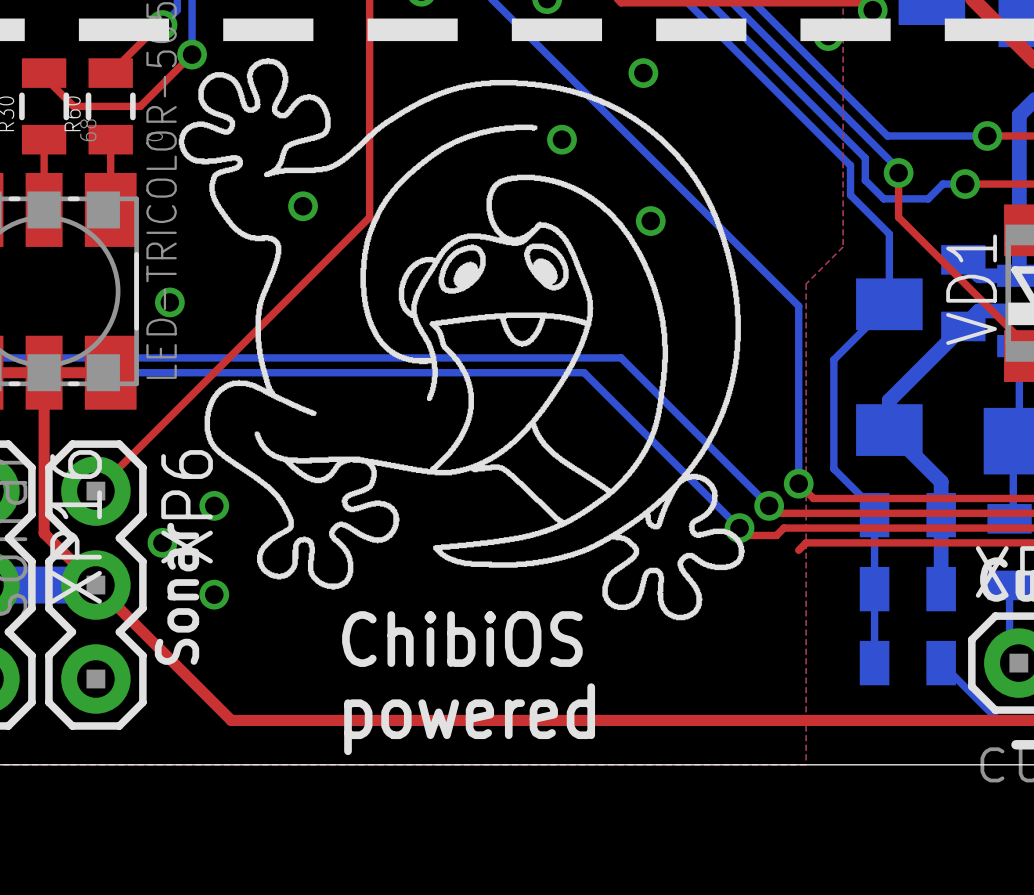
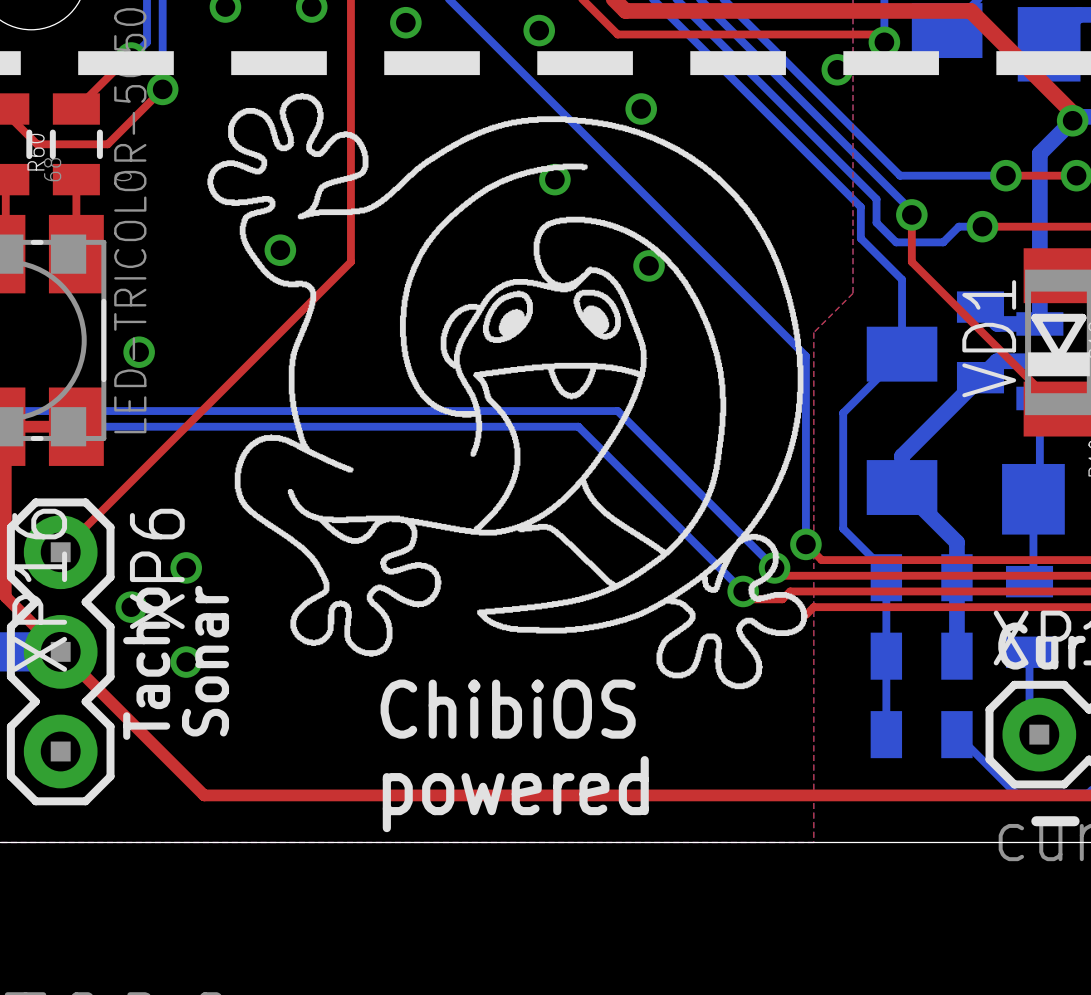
drawing position: (461, 339) -> (507, 391)
text: Sonar (176, 593) -> Tacho (146, 663)
text: none -> Sonar (205, 661)
text position: ChibiOS (462, 639) -> ChibiOS (508, 709)
text position: powered (469, 719) -> powered (515, 794)

